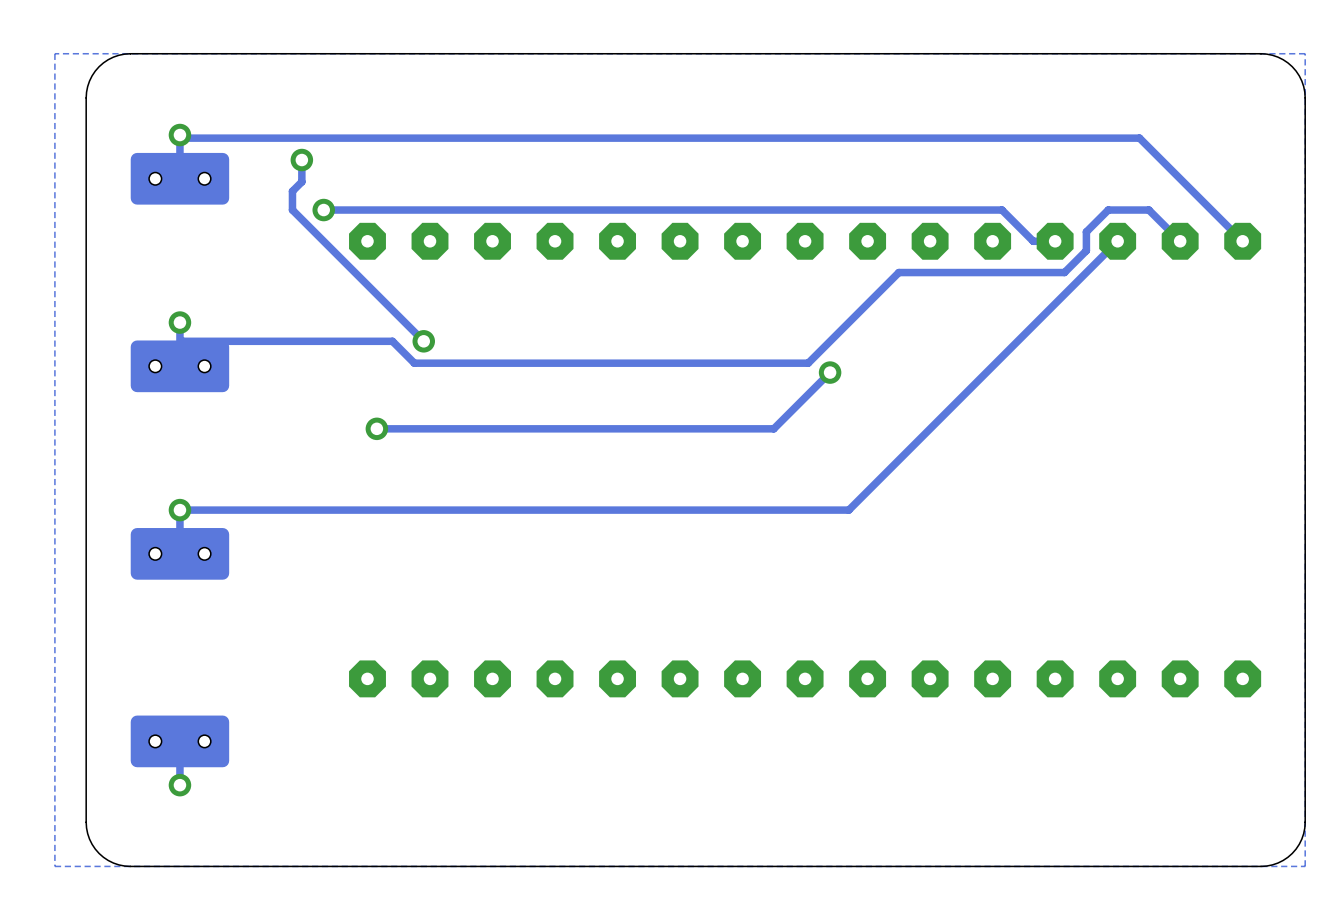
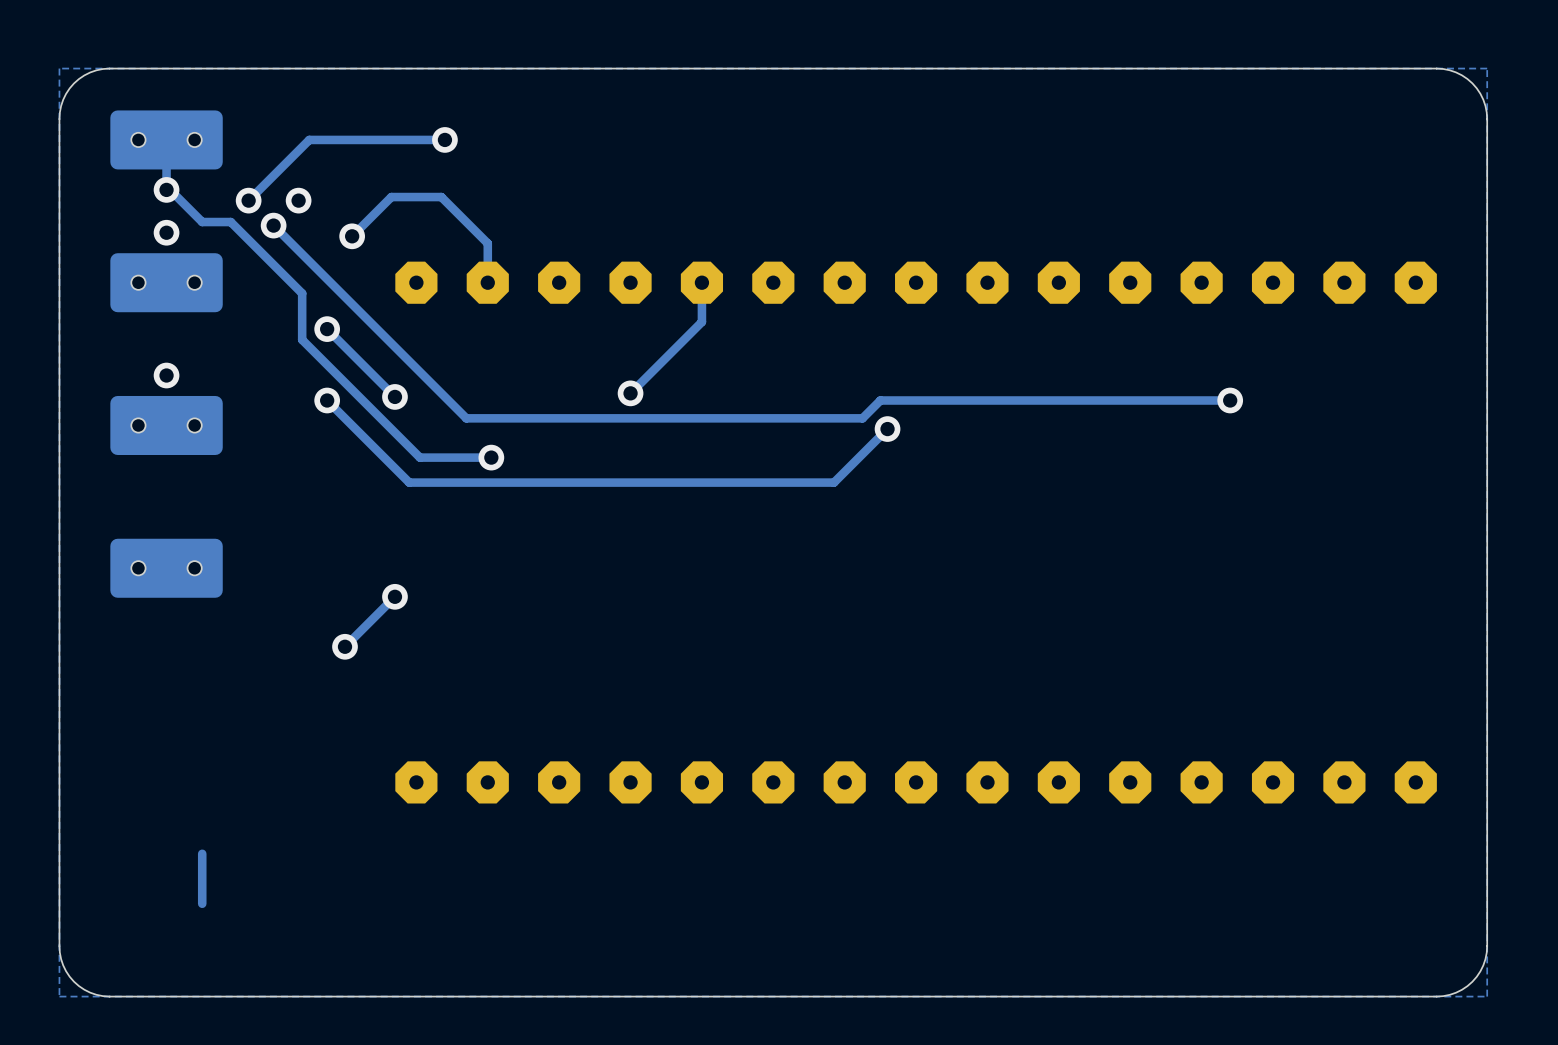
board edge: (130, 53) (113, 57) (99, 66) (89, 81) (86, 97) (86, 822) (89, 839) (99, 853) (113, 863) (130, 866) -> (145, 68) (102, 69) (84, 75) (73, 83) (66, 93) (61, 106) (59, 119) (59, 952) (66, 971) (73, 981) (84, 989) (102, 996) (145, 996)
track: none -> (166, 139) (166, 189) (170, 189) (202, 222) (230, 222) (302, 293) (302, 339) (419, 457) (491, 457)
part: none -> (166, 139)
track: none -> (444, 139) (309, 139) (248, 200)
via: none -> (444, 139)
via: (179, 135) -> none
via: none -> (166, 189)
track: (301, 160) (301, 181) (292, 191) (292, 210) (423, 341) -> none
via: (301, 160) -> none
via: none -> (248, 200)
via: none -> (298, 200)
track: (179, 178) (179, 135) (183, 138) (1139, 138) (1242, 241) -> none
part: (179, 178) -> none
via: none -> (273, 225)
via: none -> (166, 232)
track: none -> (352, 236) (391, 197) (441, 197) (487, 243) (487, 282)
track: (323, 210) (1002, 210) (1033, 241) (1055, 241) -> none
via position: (323, 210) -> (352, 236)
part: none -> (166, 282)
track: none -> (701, 282) (701, 321) (630, 393)
track: (1117, 241) (848, 510) (179, 510) (179, 553) -> none
track: (1180, 241) (1148, 210) (1108, 210) (1086, 231) (1086, 250) (1064, 272) (898, 272) (808, 363) (414, 363) (411, 360) -> (1230, 400) (880, 400) (862, 418) (466, 418)
track: none -> (327, 329) (394, 396)
via: none -> (327, 329)
track: (179, 322) (179, 366) (183, 341) (392, 341) -> (273, 225) (444, 396)
via position: (179, 322) -> (166, 375)
via: none -> (630, 393)
via: none -> (394, 396)
via: (423, 341) -> none
track: none -> (327, 400) (409, 482) (834, 482) (887, 429)
via: none -> (327, 400)
via: none -> (1230, 400)
part position: (179, 366) -> (166, 425)
track: (830, 372) (773, 428) (376, 428) -> none
via position: (830, 372) -> (887, 429)
via: none -> (491, 457)
via: (376, 428) -> none
part: none -> (166, 568)
via: (179, 510) -> none
track: none -> (394, 596) (345, 646)
via: none -> (394, 596)
part: (179, 553) -> none
via: none -> (345, 646)
part: (179, 741) -> none
via: (179, 785) -> none

